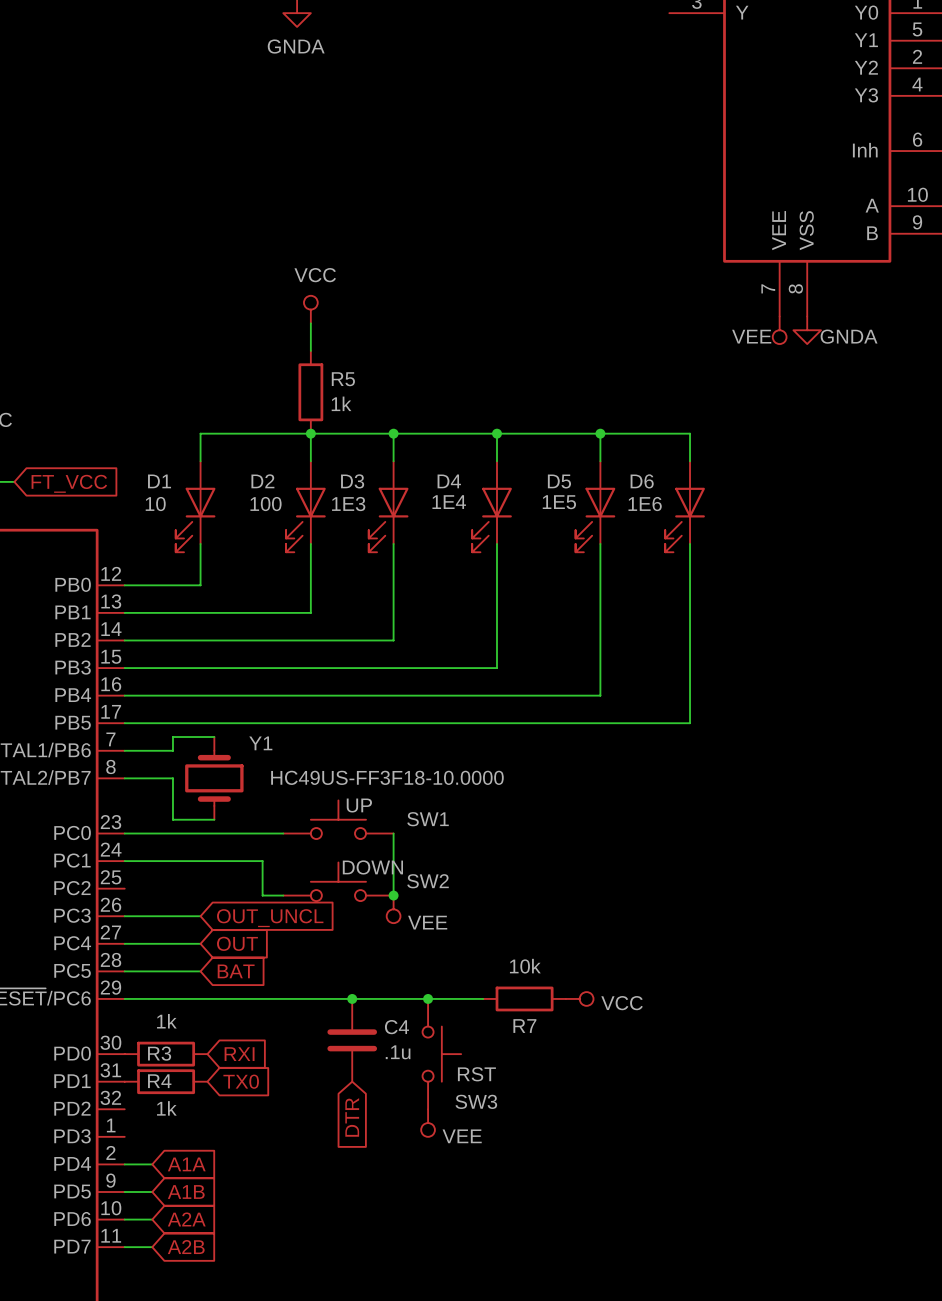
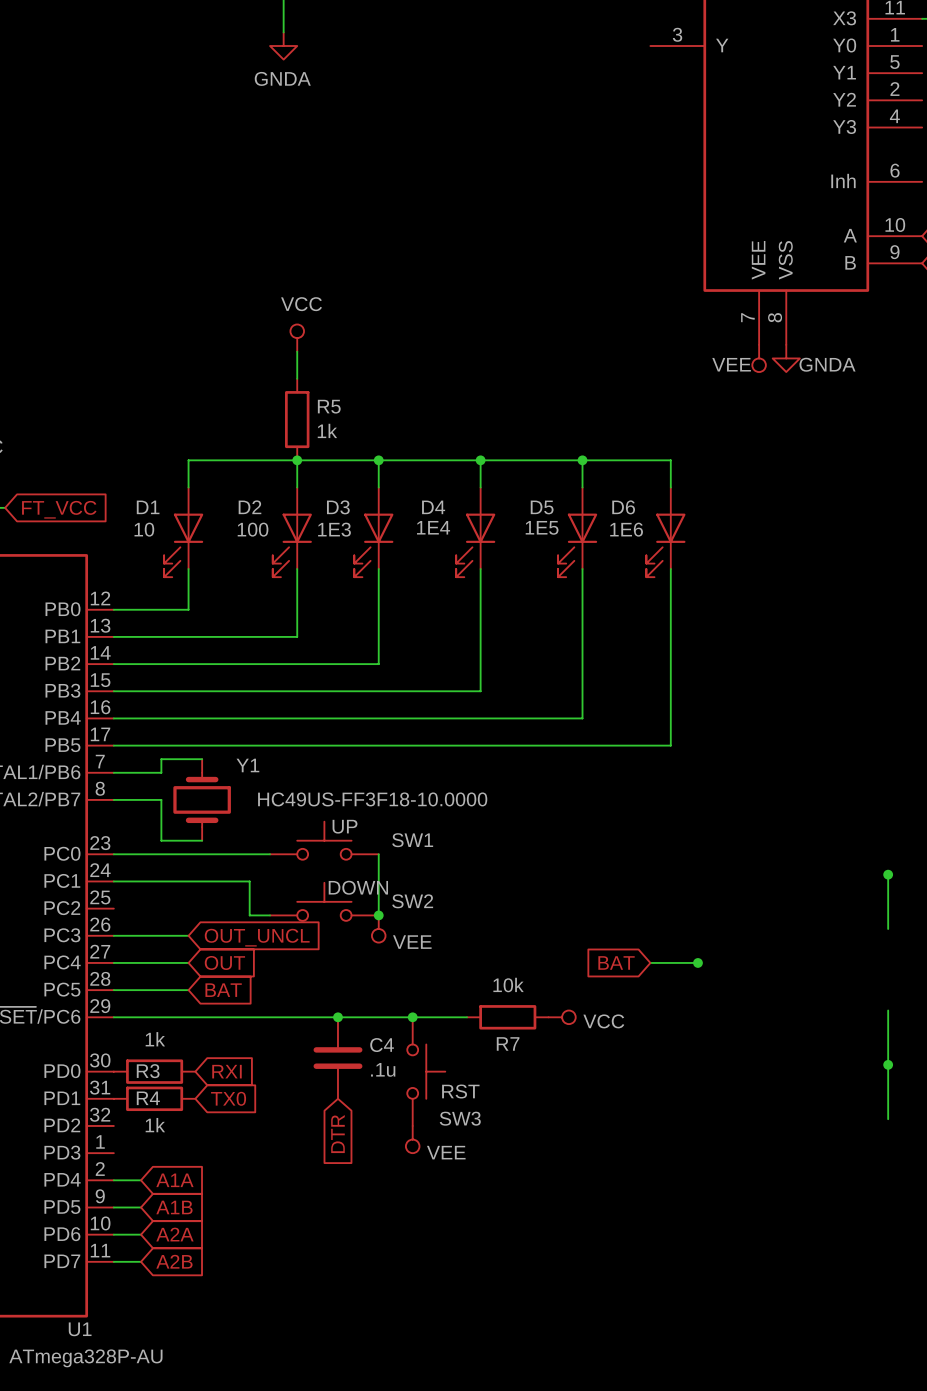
wire: none -> (888, 874) (888, 929)
junction: none -> (888, 874)
global label: none -> BAT (616, 962)
wire: none -> (650, 962) (697, 962)
junction: none -> (697, 962)
wire: none -> (888, 1010) (888, 1119)
junction: none -> (888, 1064)

